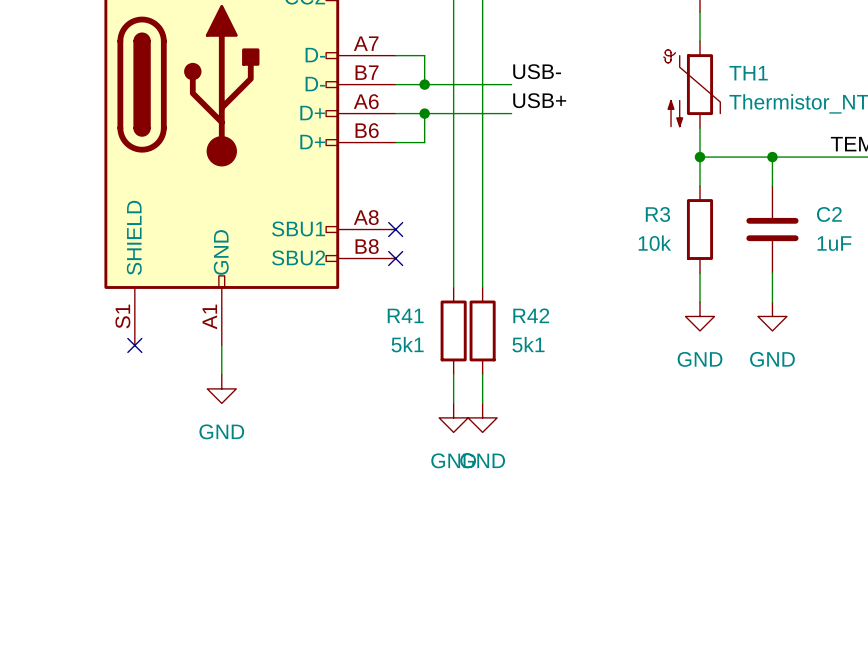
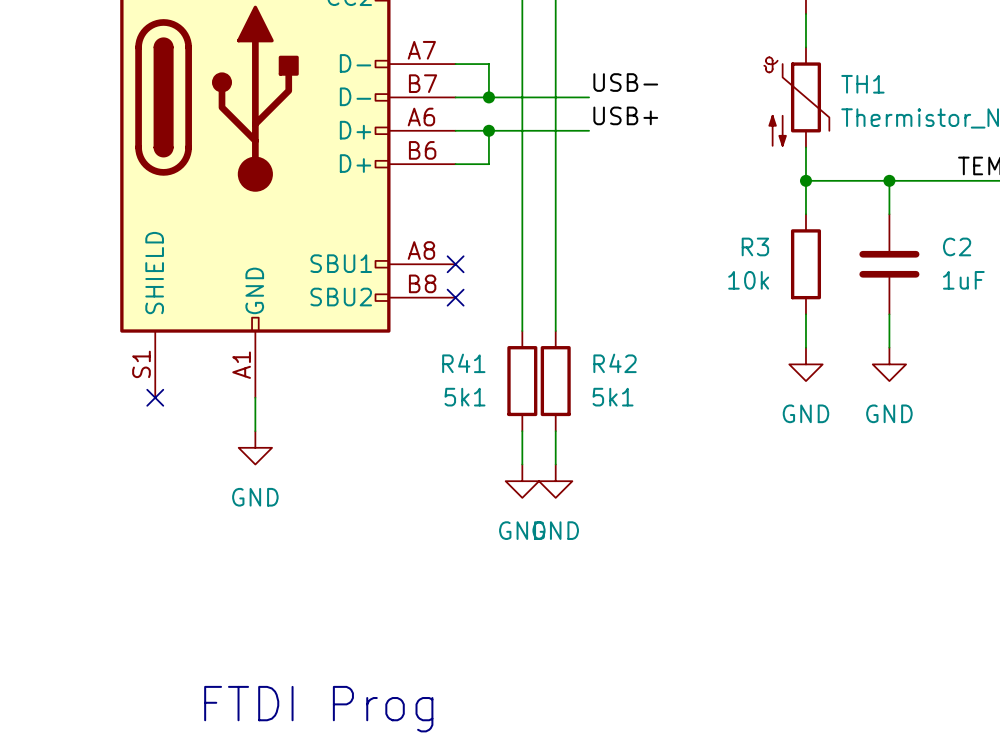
text: none -> FTDI Prog (318, 709)

